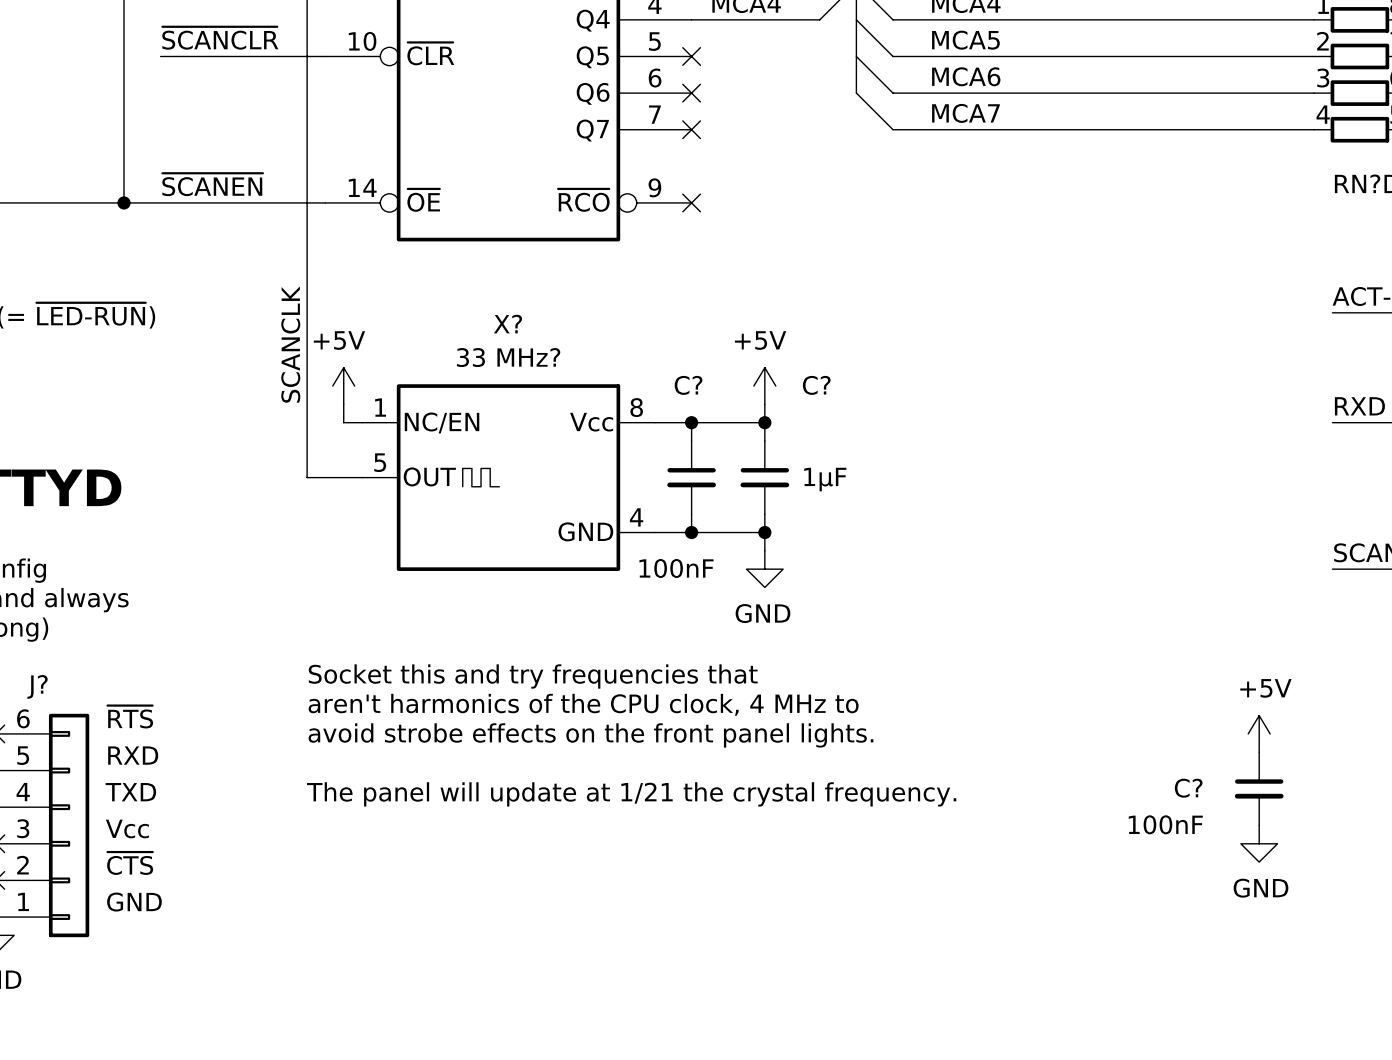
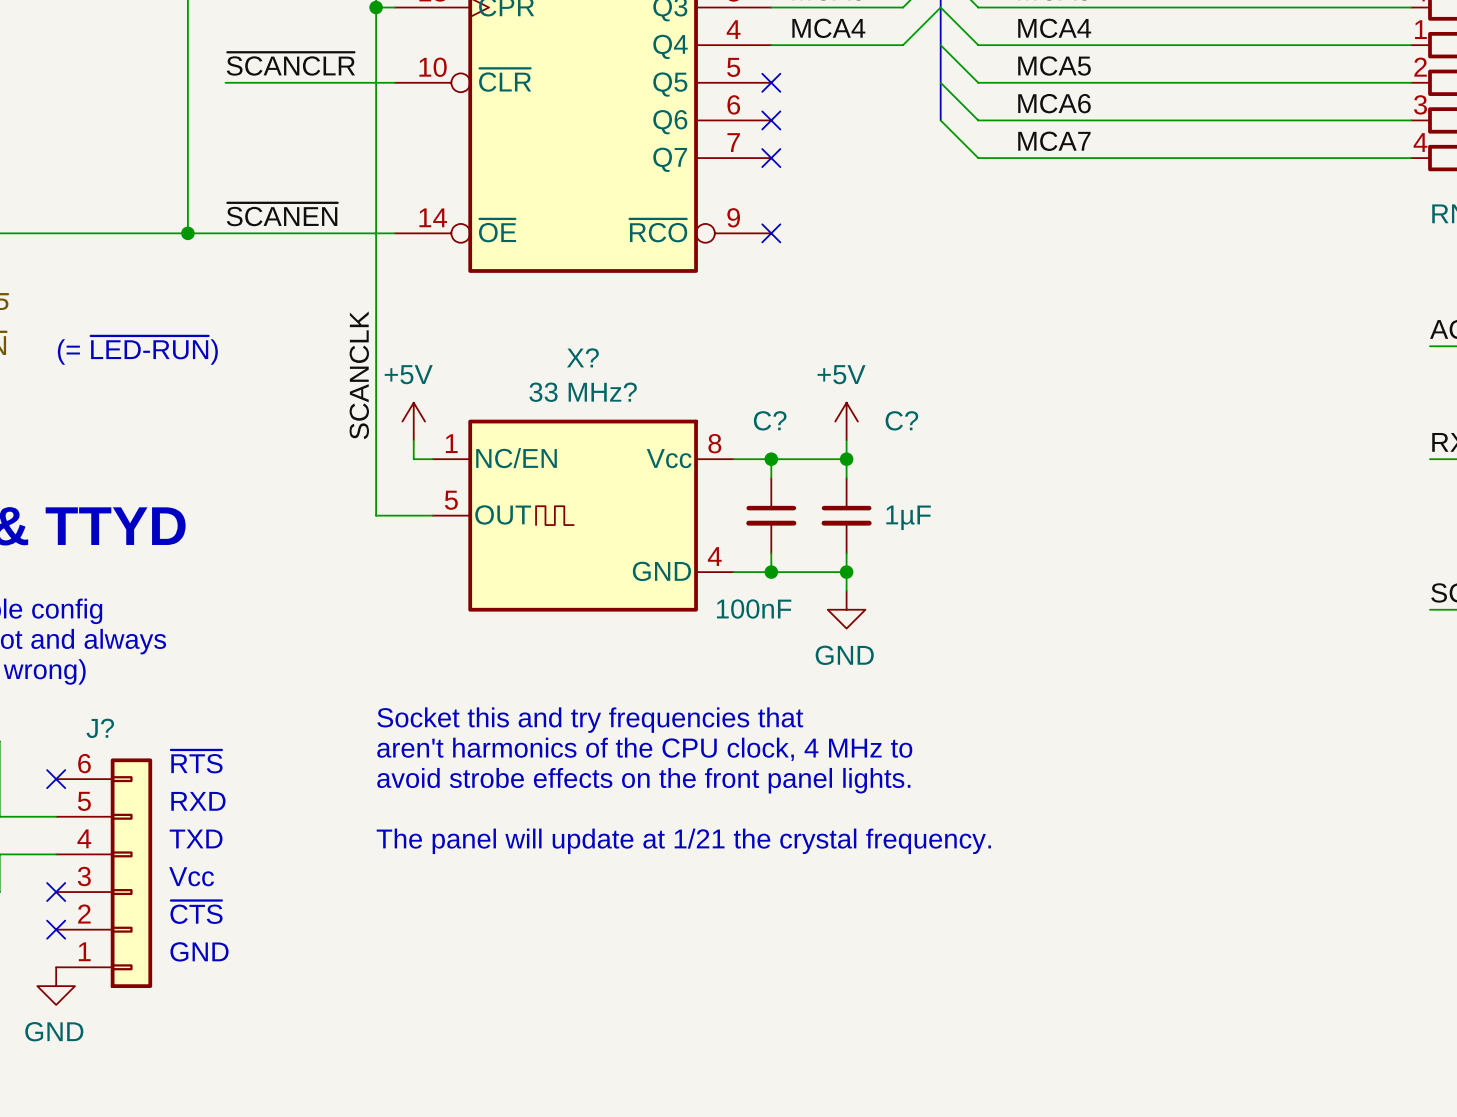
power symbol: +5V (1259, 733) -> none
C?: 100nF (1259, 788) -> none
power symbol: GND (1259, 843) -> none

